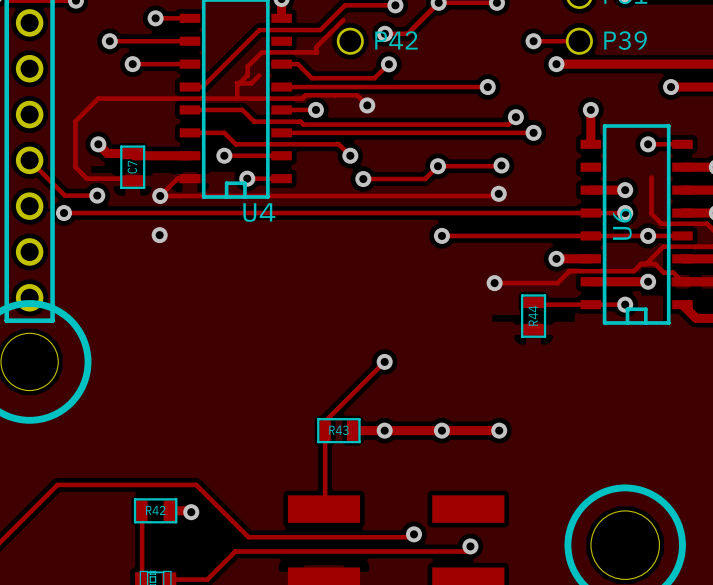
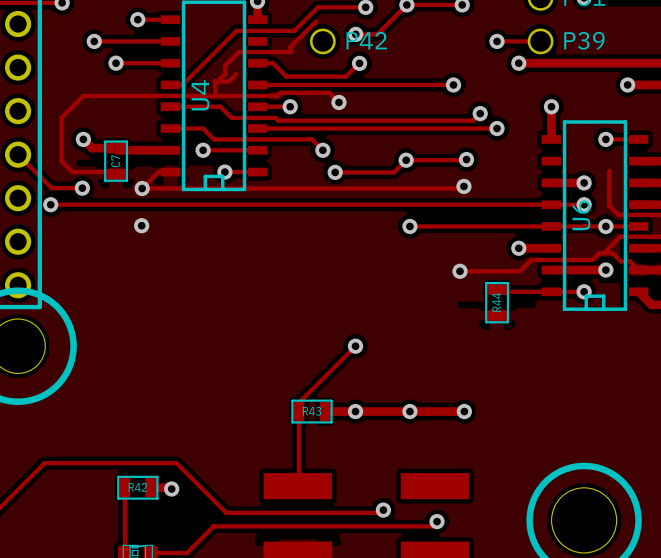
U4 name rotation: 0° (259, 212) -> 90° counterclockwise (200, 95)
U4 name position: U4 (259, 212) -> U4 (200, 95)

